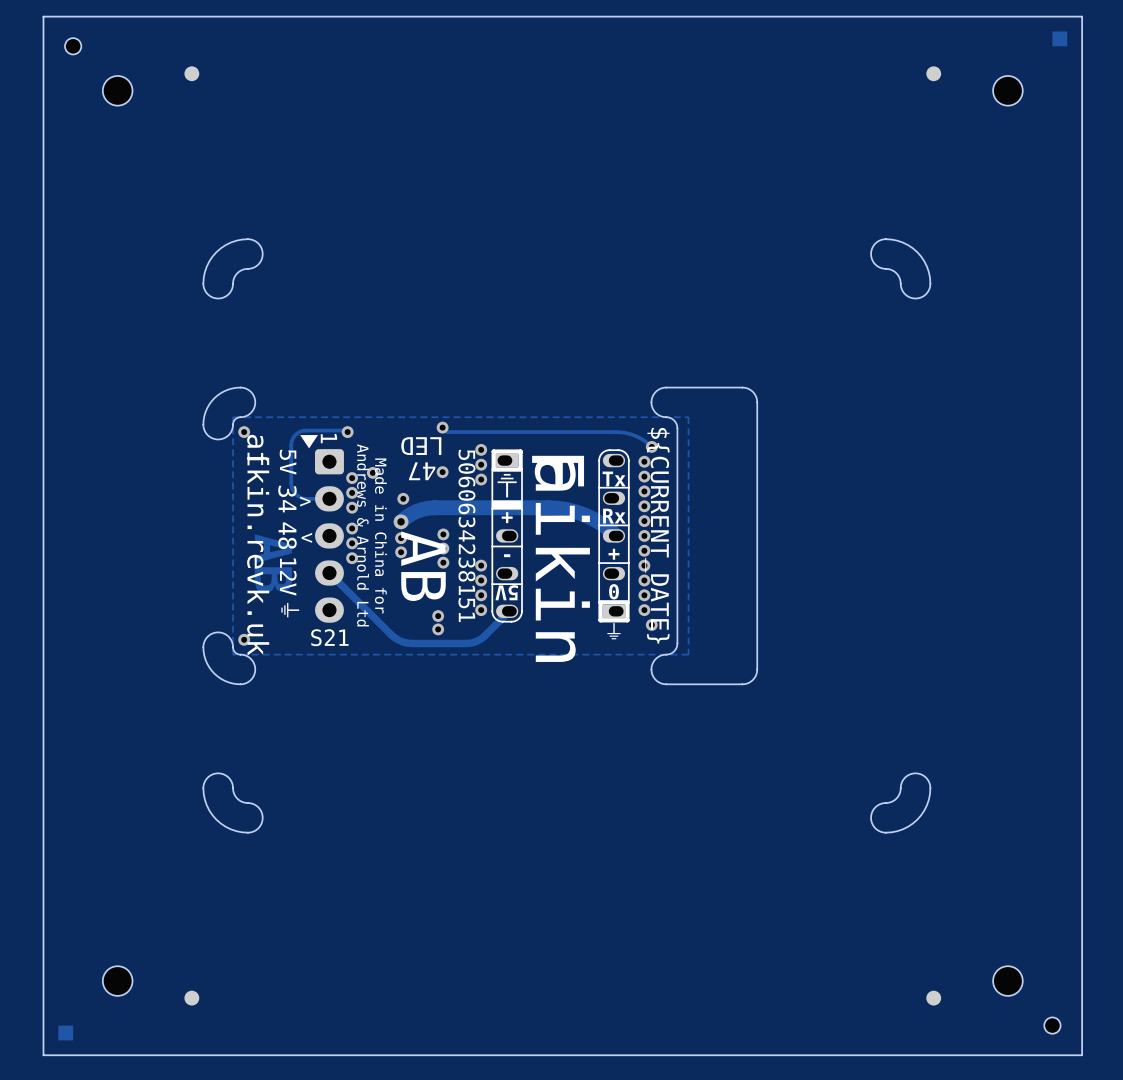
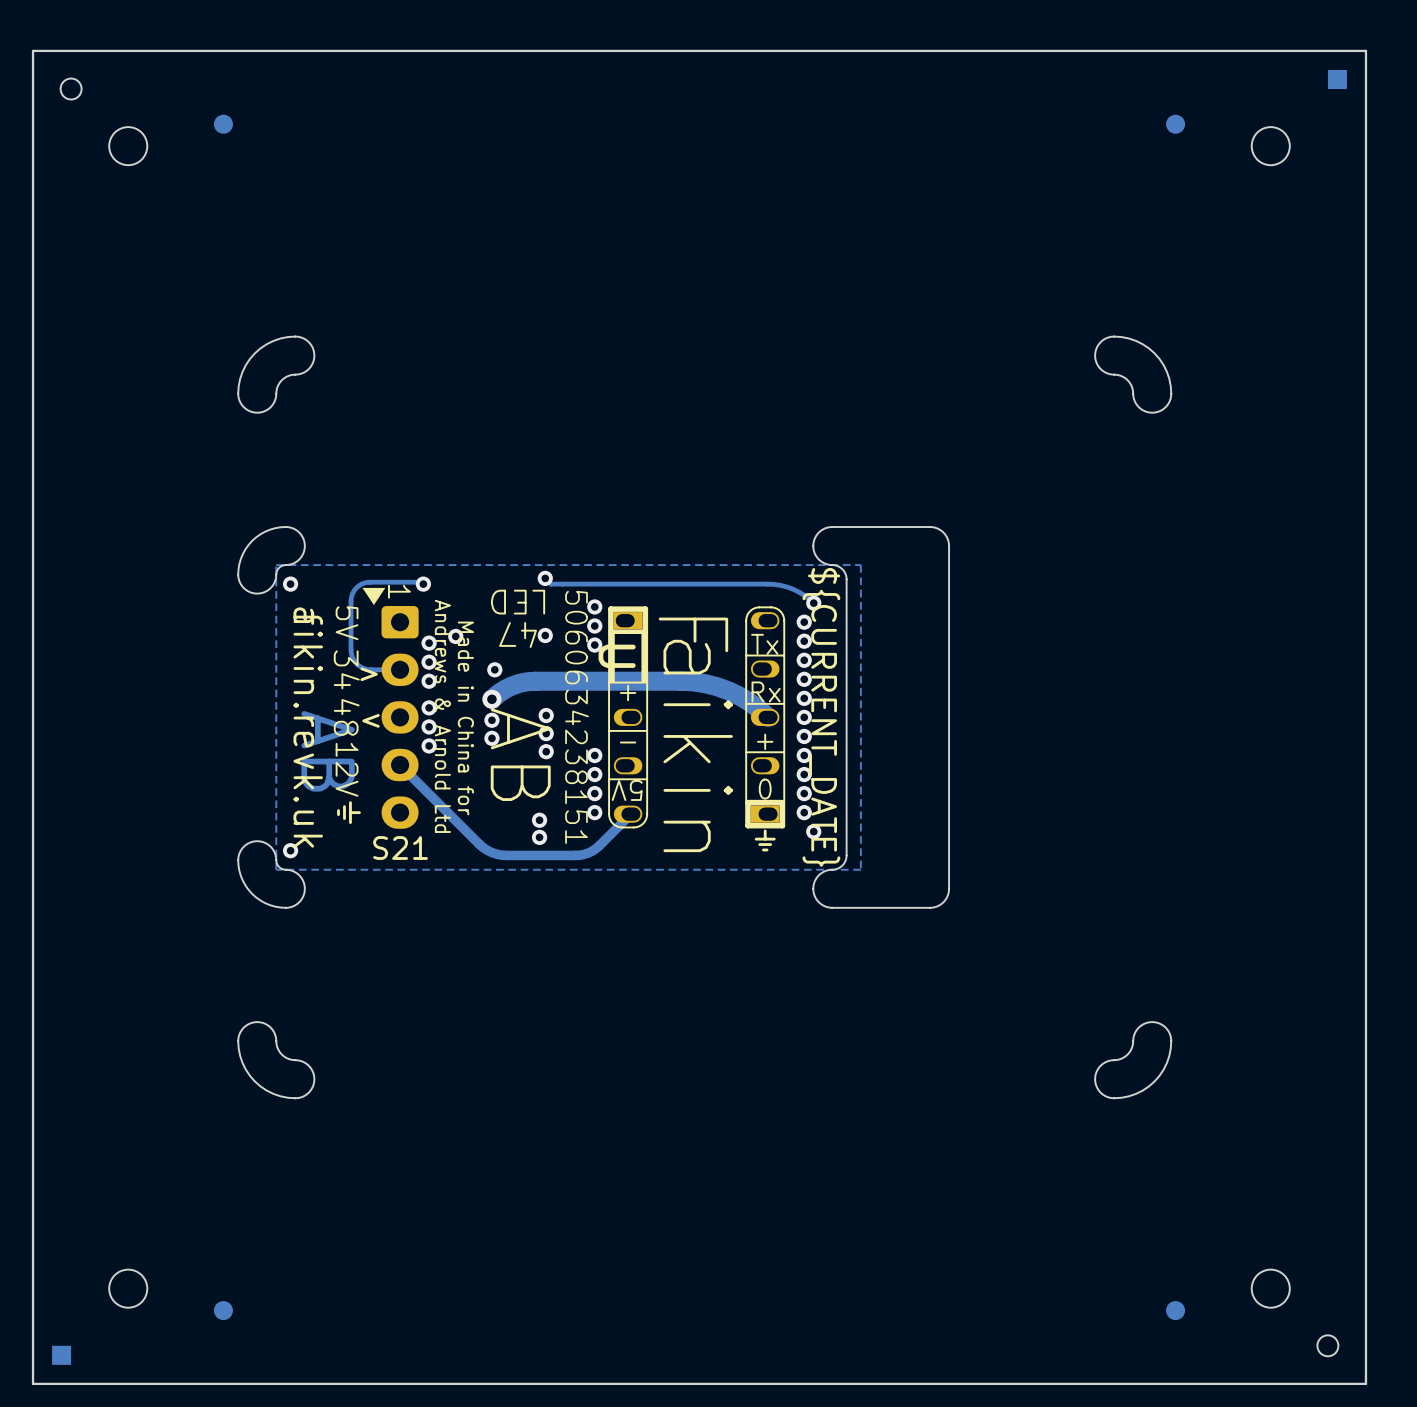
part footprint: [491, 449, 523, 623] -> [608, 606, 649, 829]

